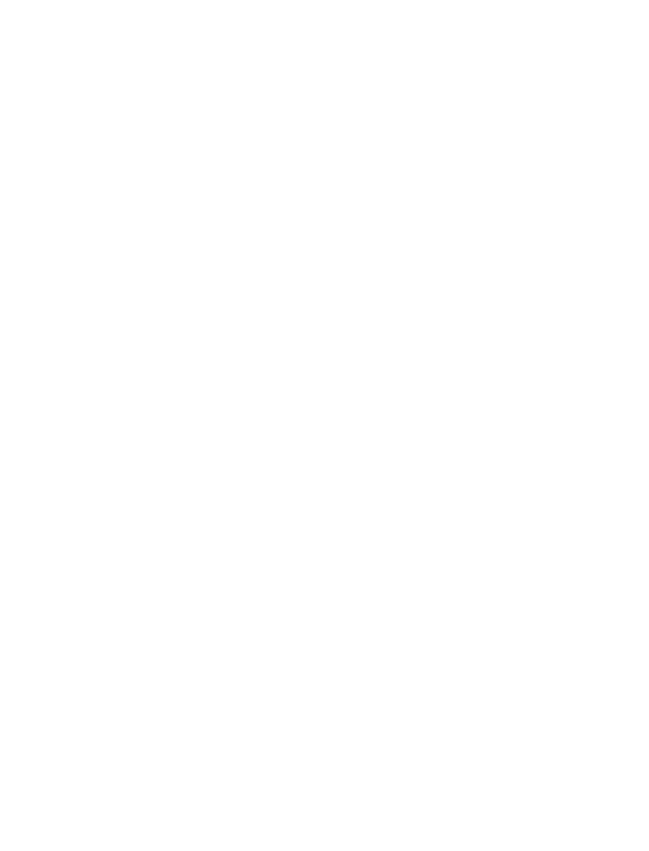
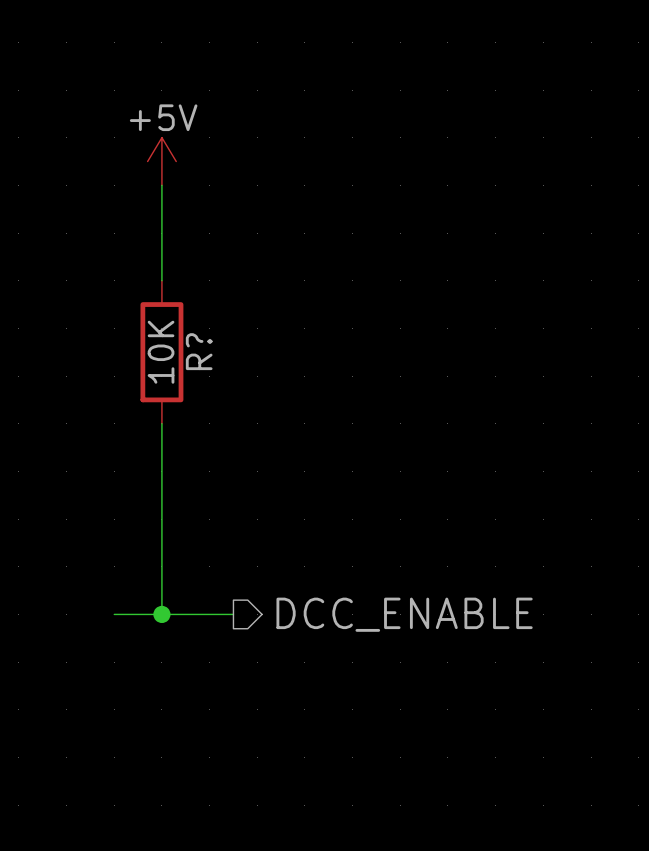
power symbol: none -> +5V (161, 161)
wire: none -> (161, 185) (161, 280)
R?: none -> 10K (161, 352)
wire: none -> (161, 423) (161, 614)
wire: none -> (114, 614) (233, 614)
junction: none -> (161, 614)
hierarchical label: none -> DCC_ENABLE (404, 614)

